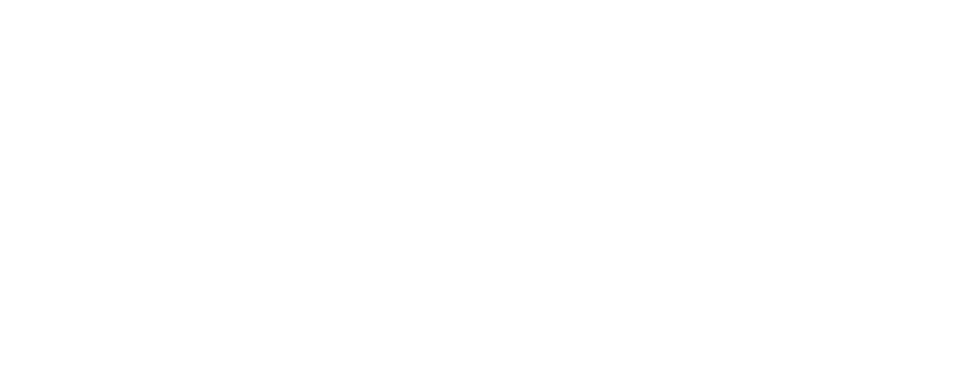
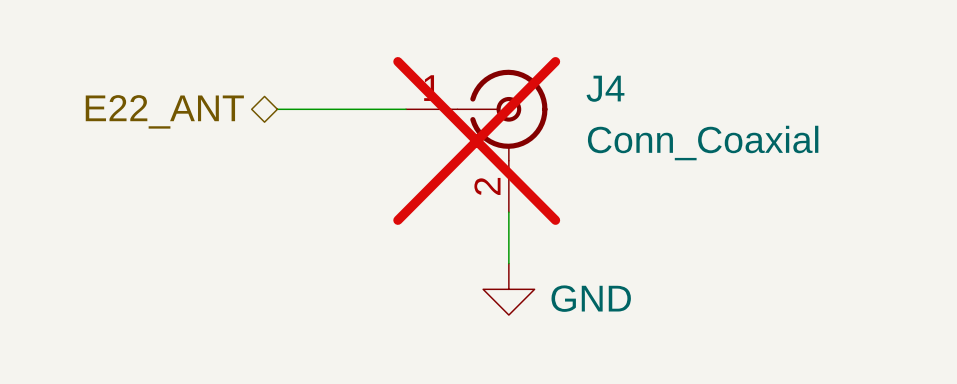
wire: none -> (277, 109) (406, 109)
hierarchical label: none -> E22_ANT (164, 111)
J4: none -> Conn_Coaxial (476, 140)
wire: none -> (508, 212) (508, 263)
power symbol: none -> GND (508, 289)

